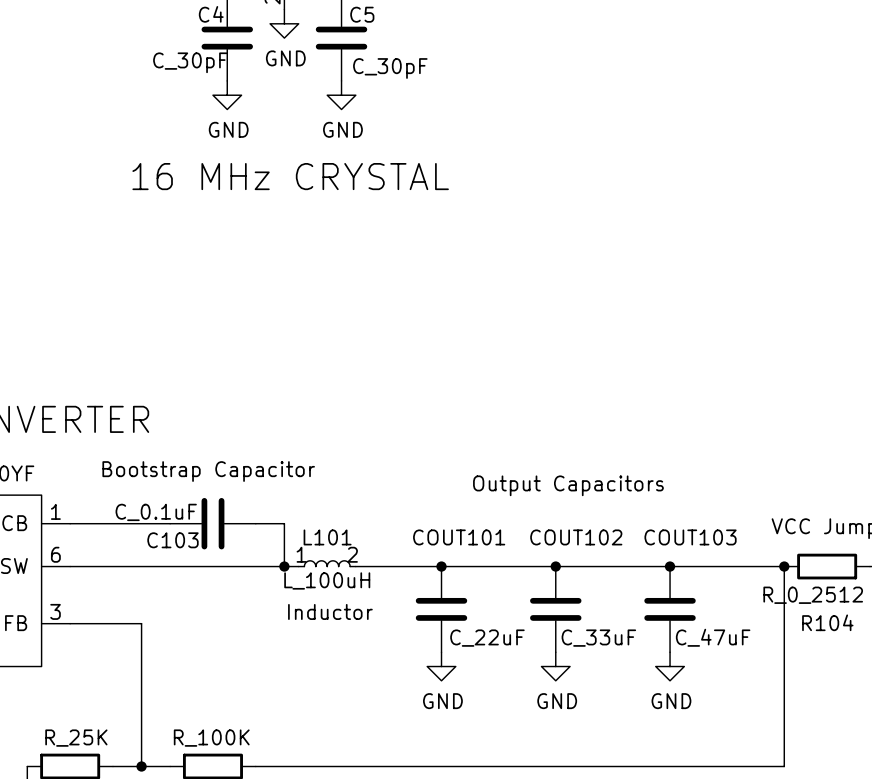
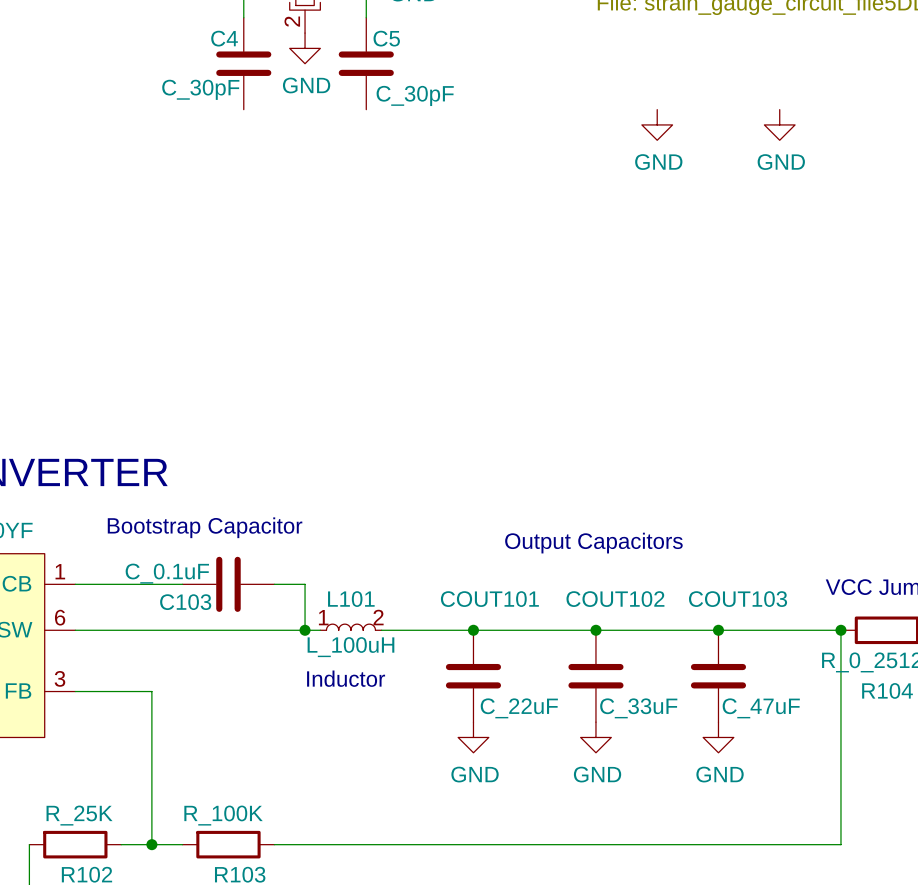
power symbol: GND (227, 95) -> none
power symbol: GND (341, 95) -> none
power symbol: none -> GND (657, 124)
power symbol: none -> GND (779, 124)
text: 16 MHz CRYSTAL (290, 176) -> none

